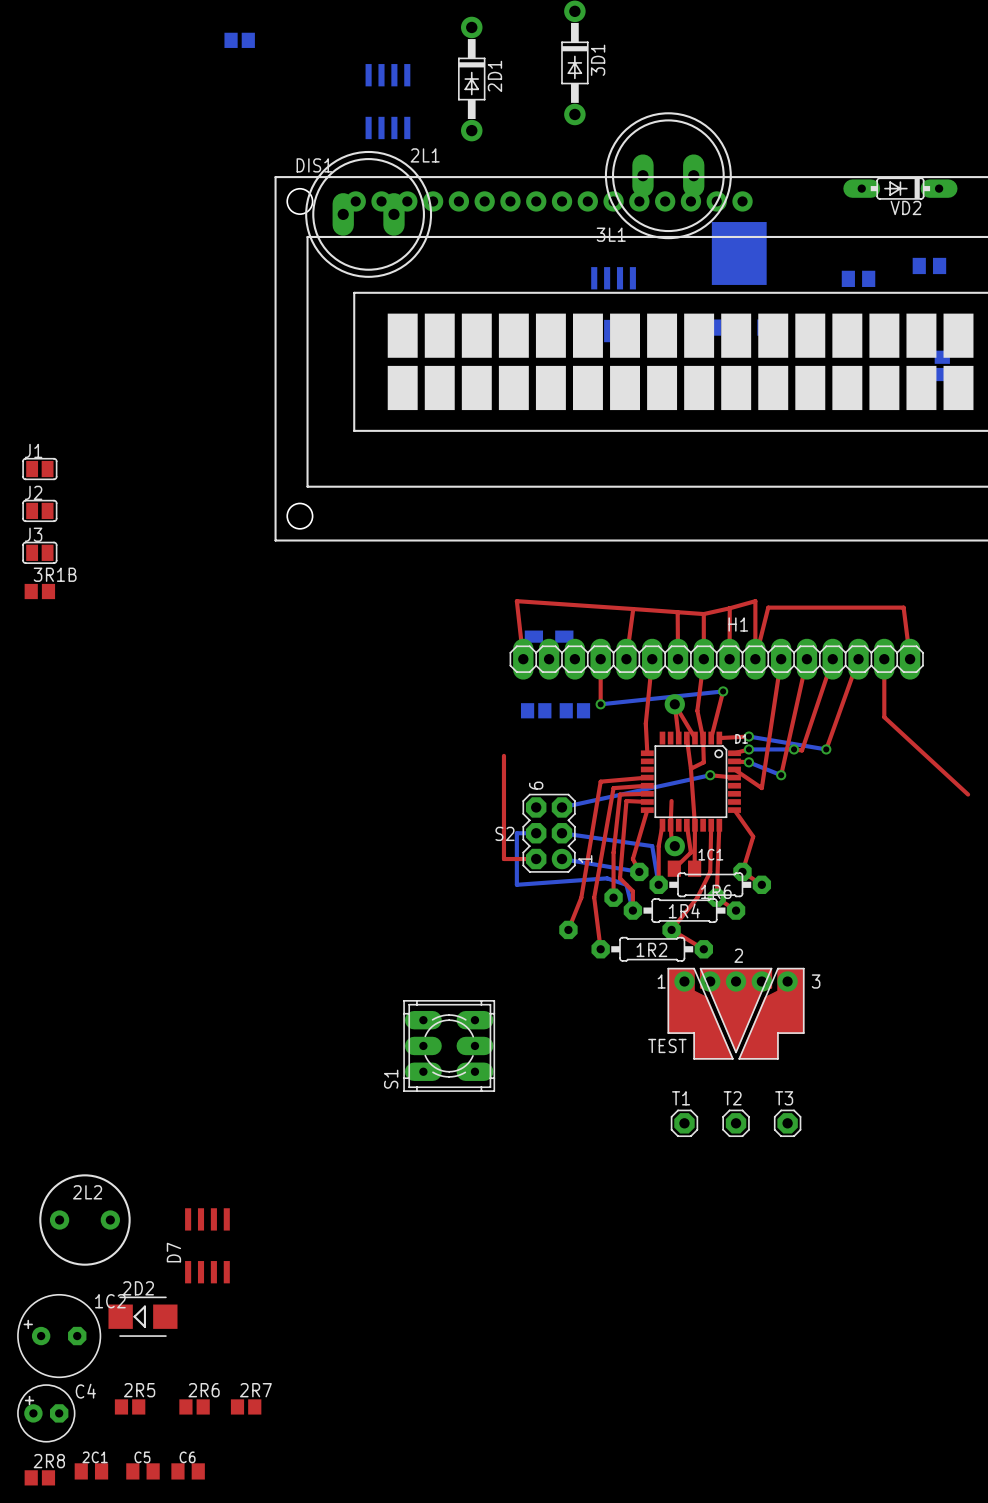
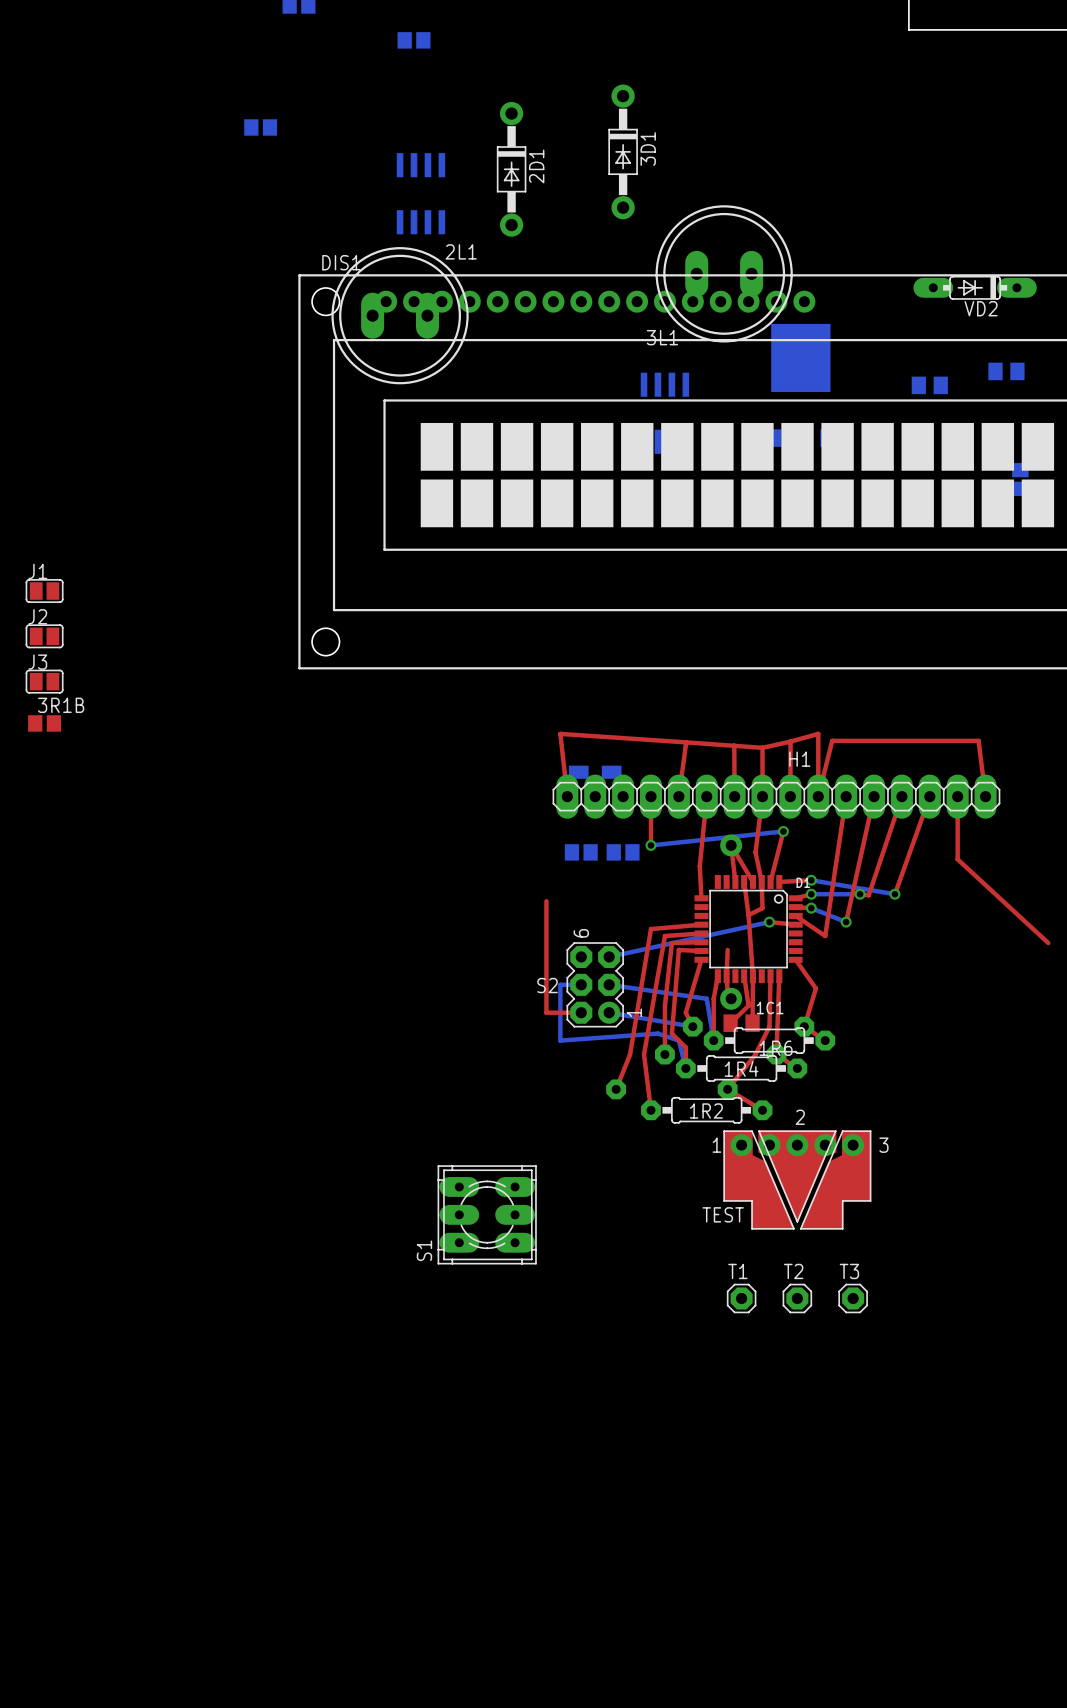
2L2: (84, 1220) -> none
D7: (207, 1245) -> none
2D2: (142, 1316) -> none
1C2: (59, 1336) -> none
2R5: (130, 1406) -> none
2R6: (194, 1406) -> none
2R7: (246, 1406) -> none
C4: (46, 1413) -> none
2C1: (91, 1471) -> none
C5: (142, 1471) -> none
C6: (188, 1471) -> none
2R8: (39, 1477) -> none

